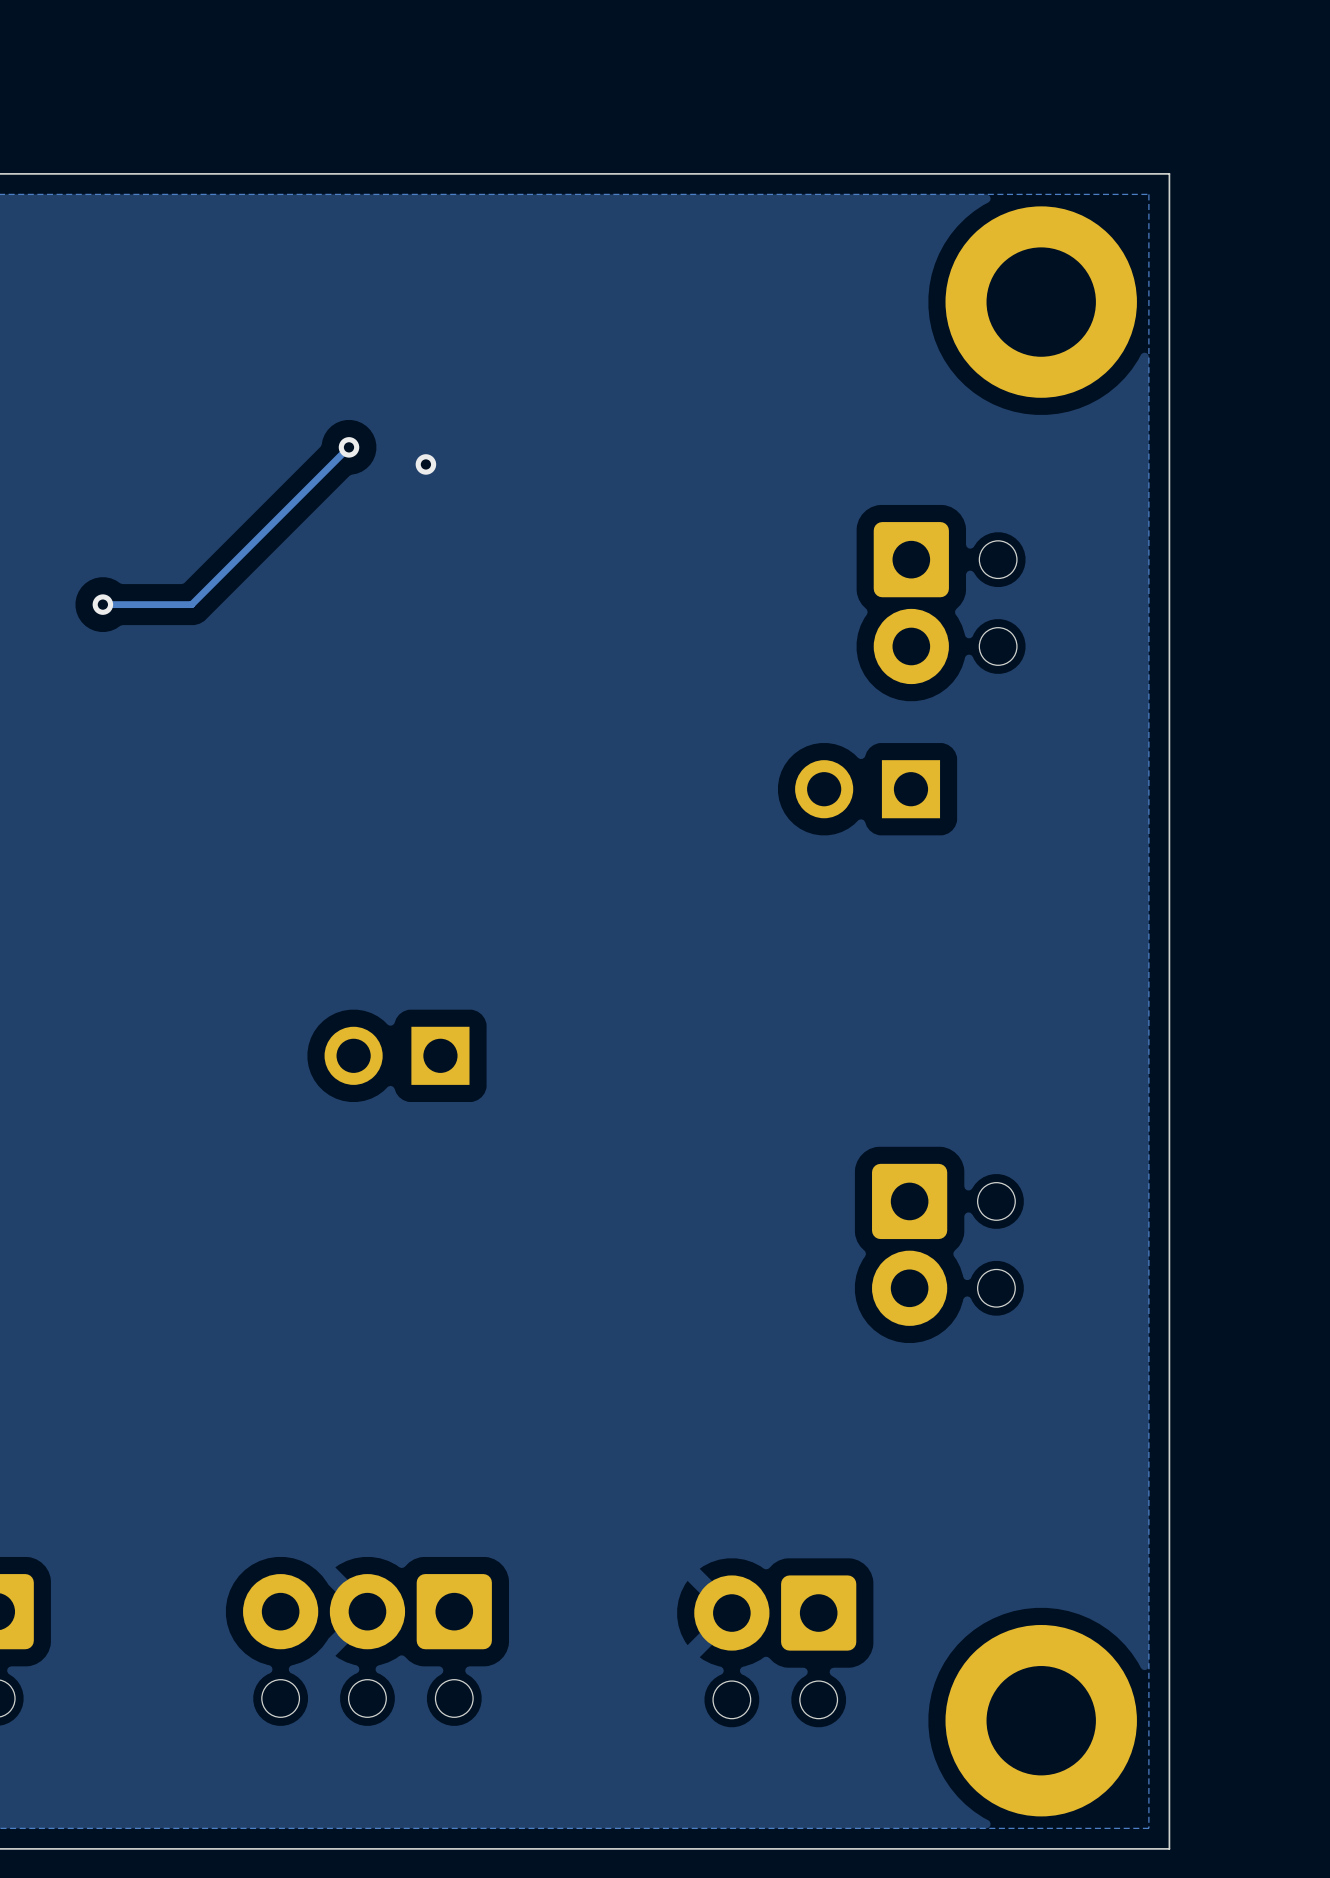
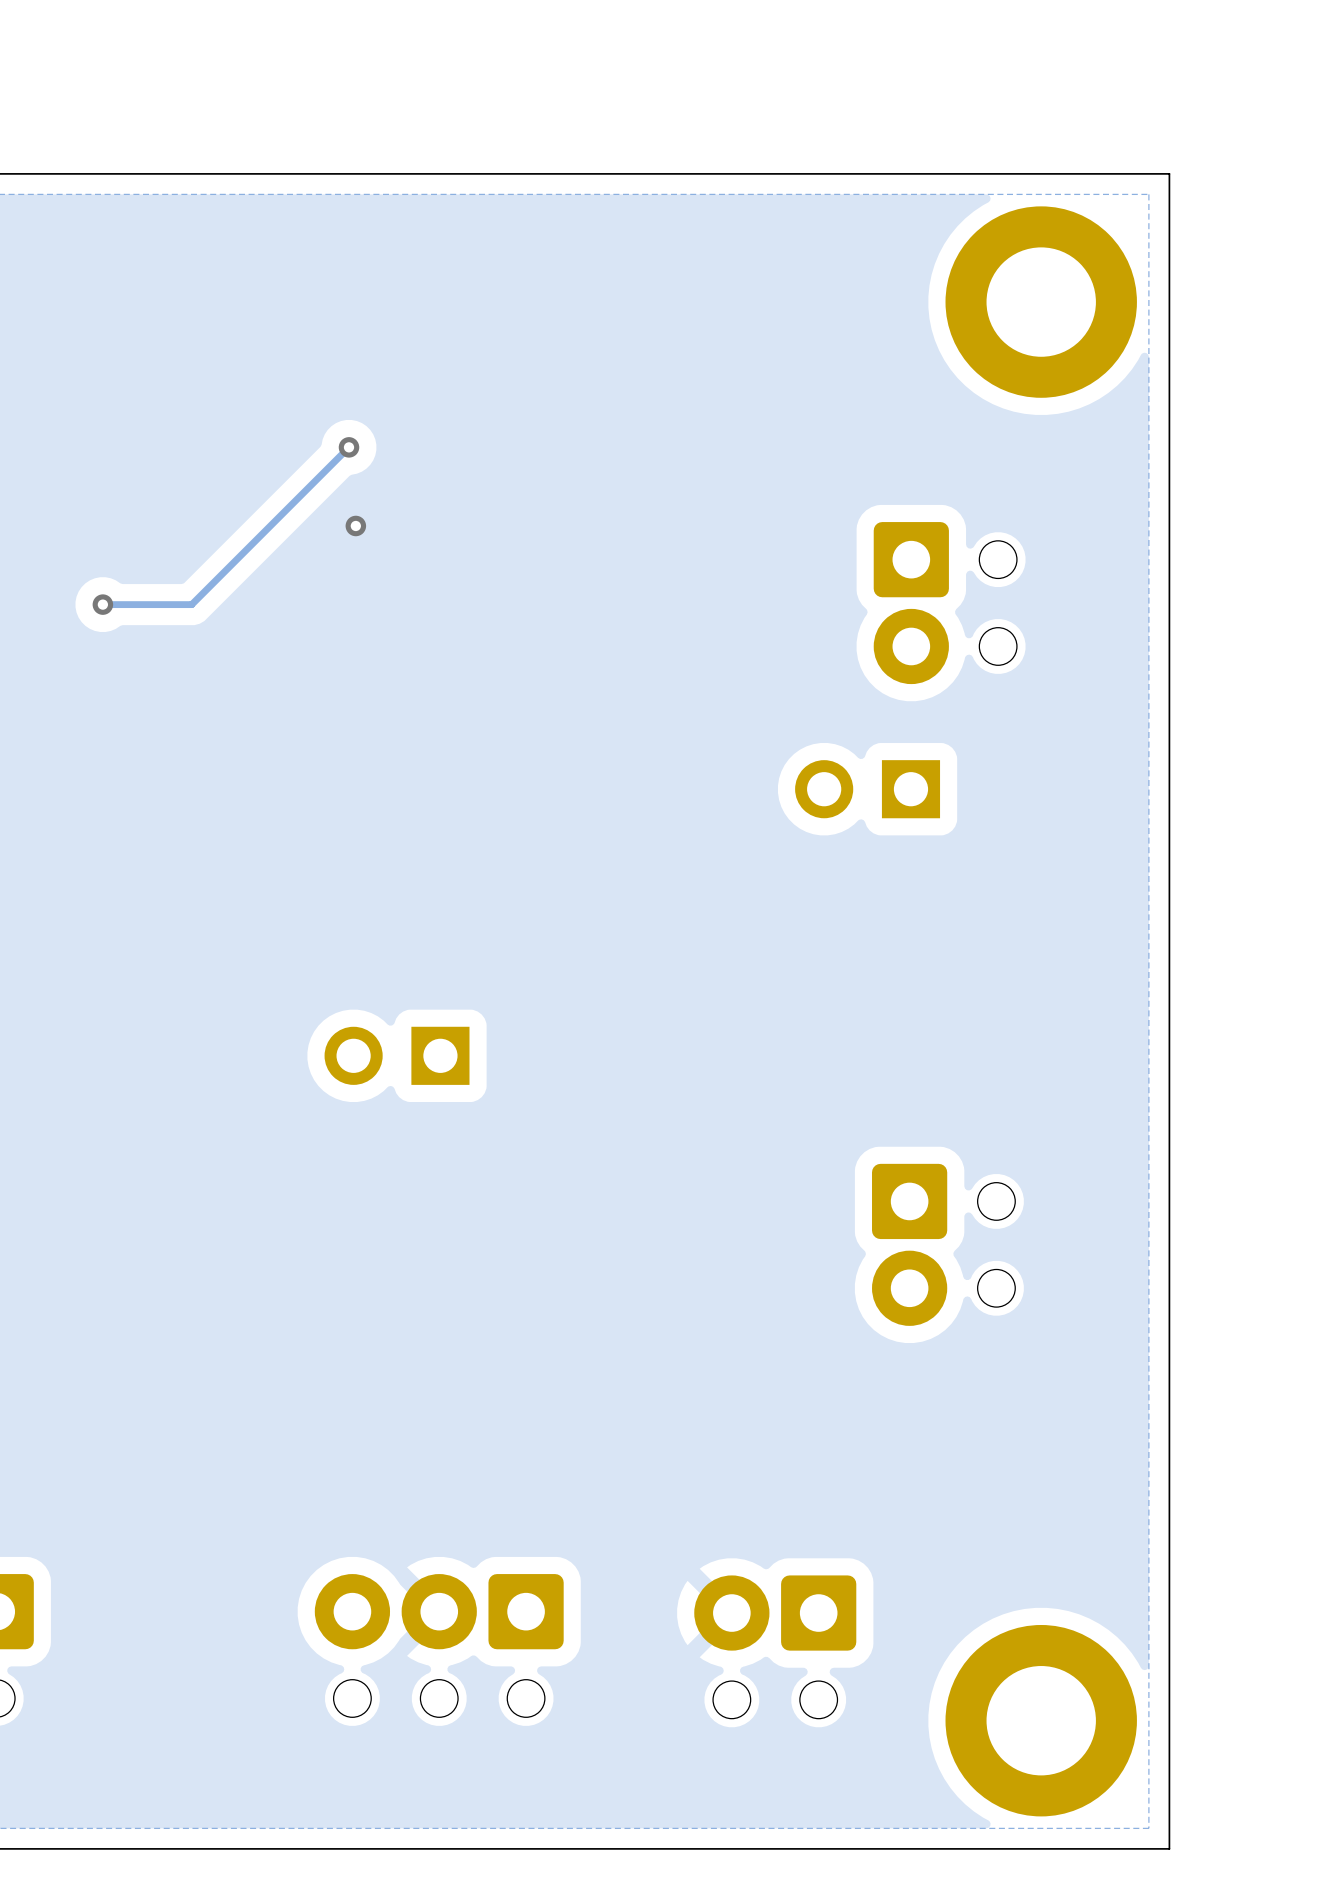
via position: (425, 464) -> (355, 525)
part position: (367, 1645) -> (439, 1645)

